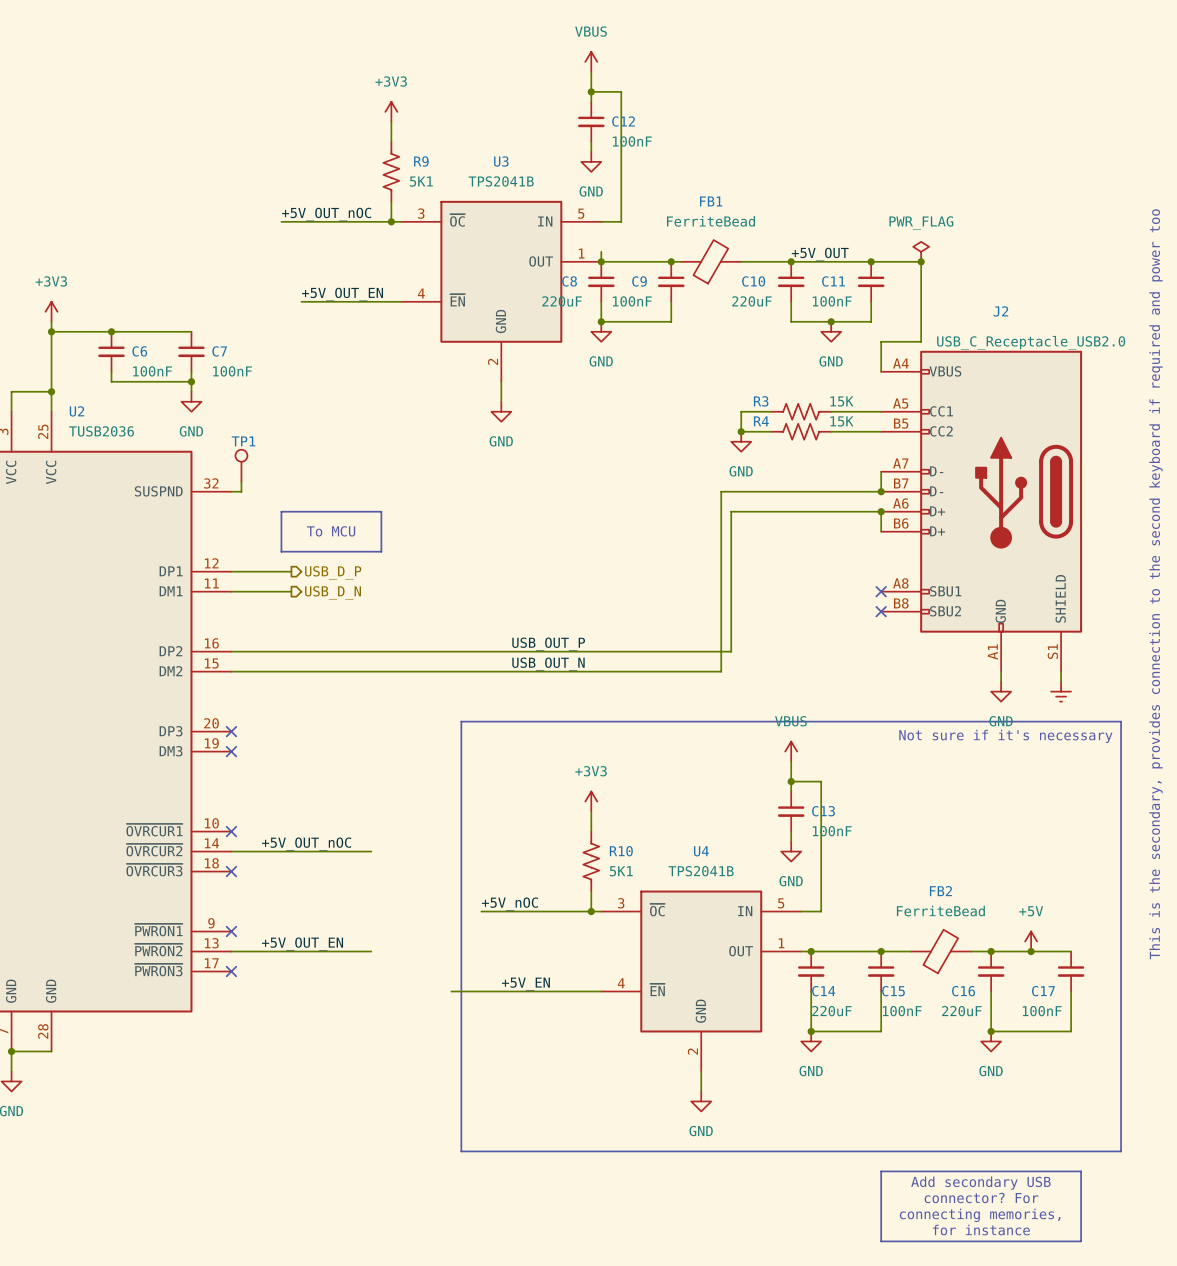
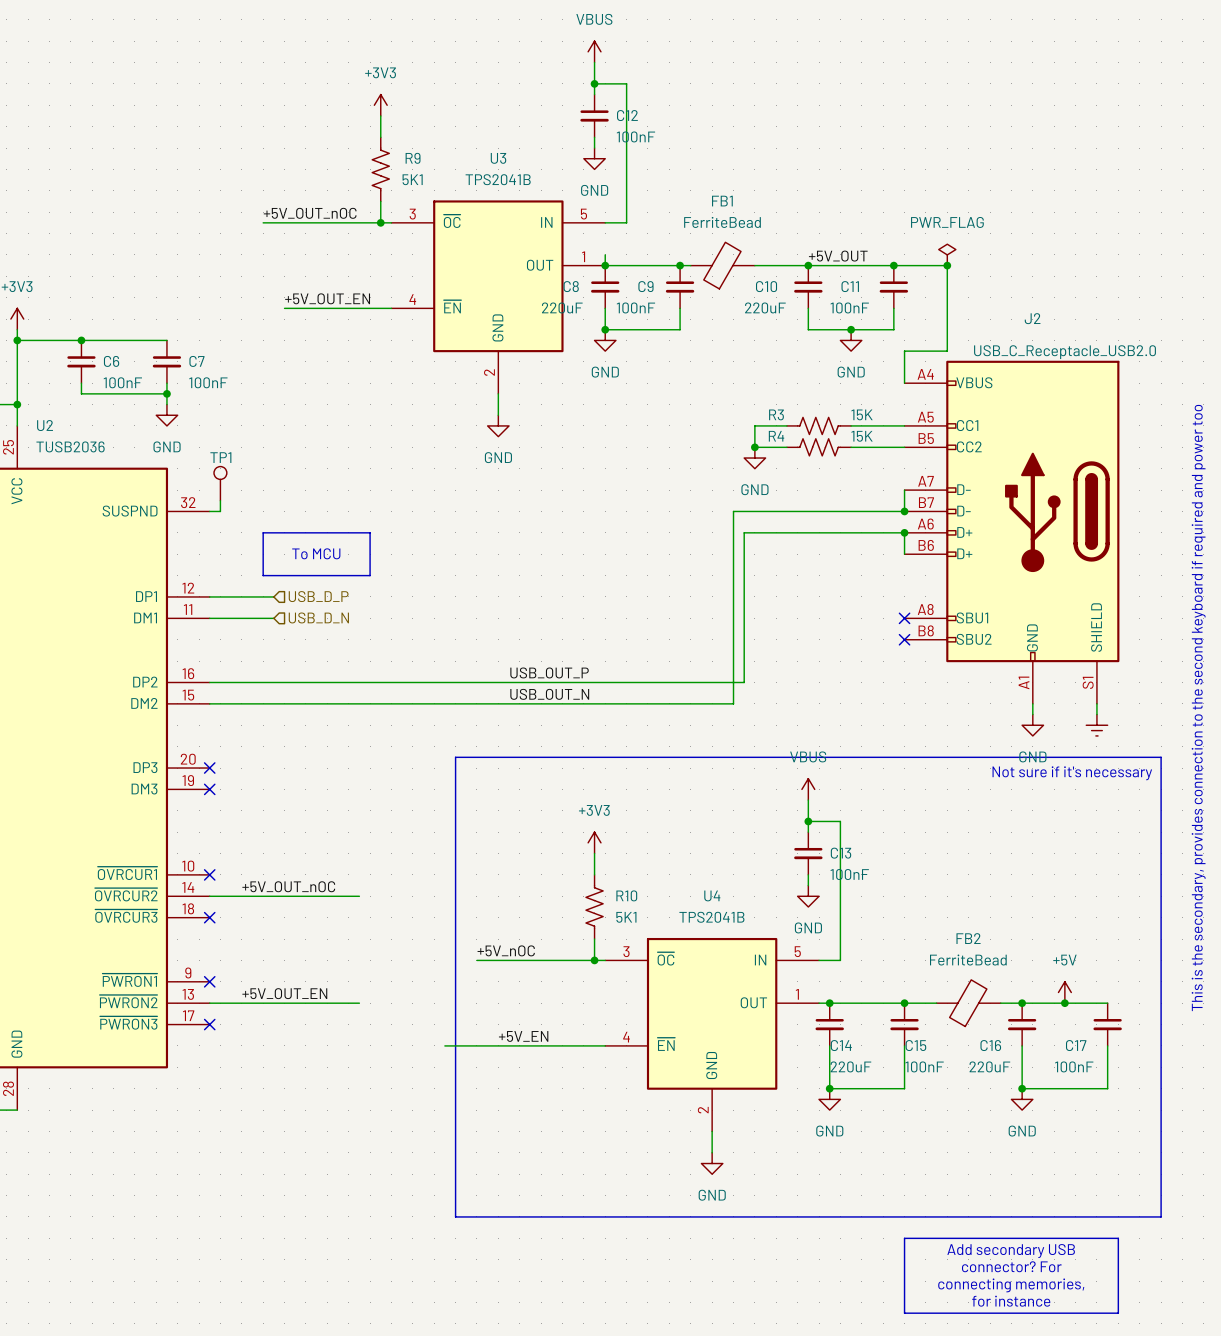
hierarchical label shape: output (333, 572) -> input (318, 596)
hierarchical label shape: output (333, 592) -> input (318, 617)

